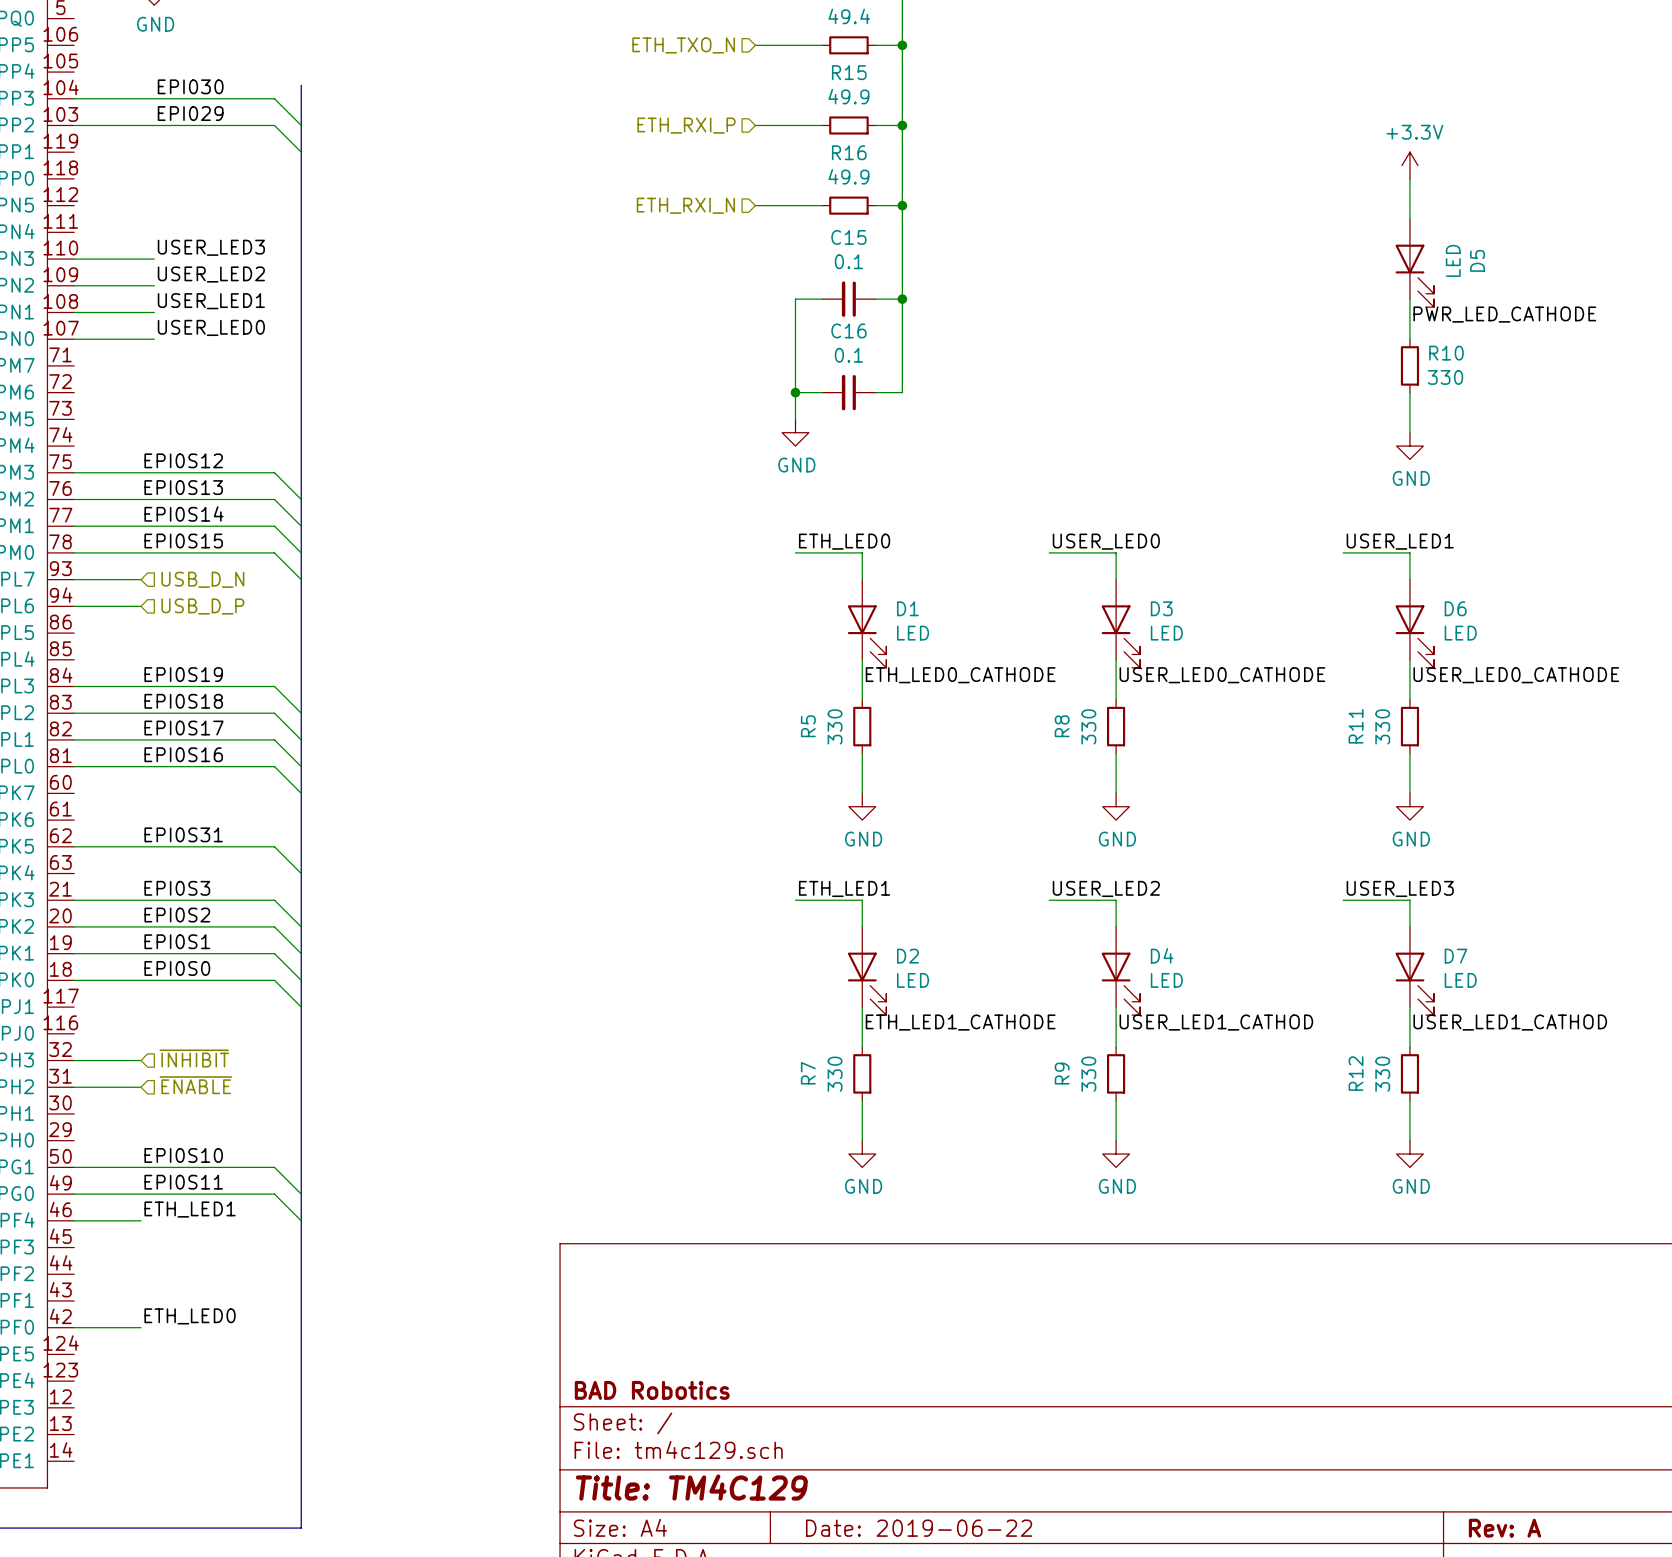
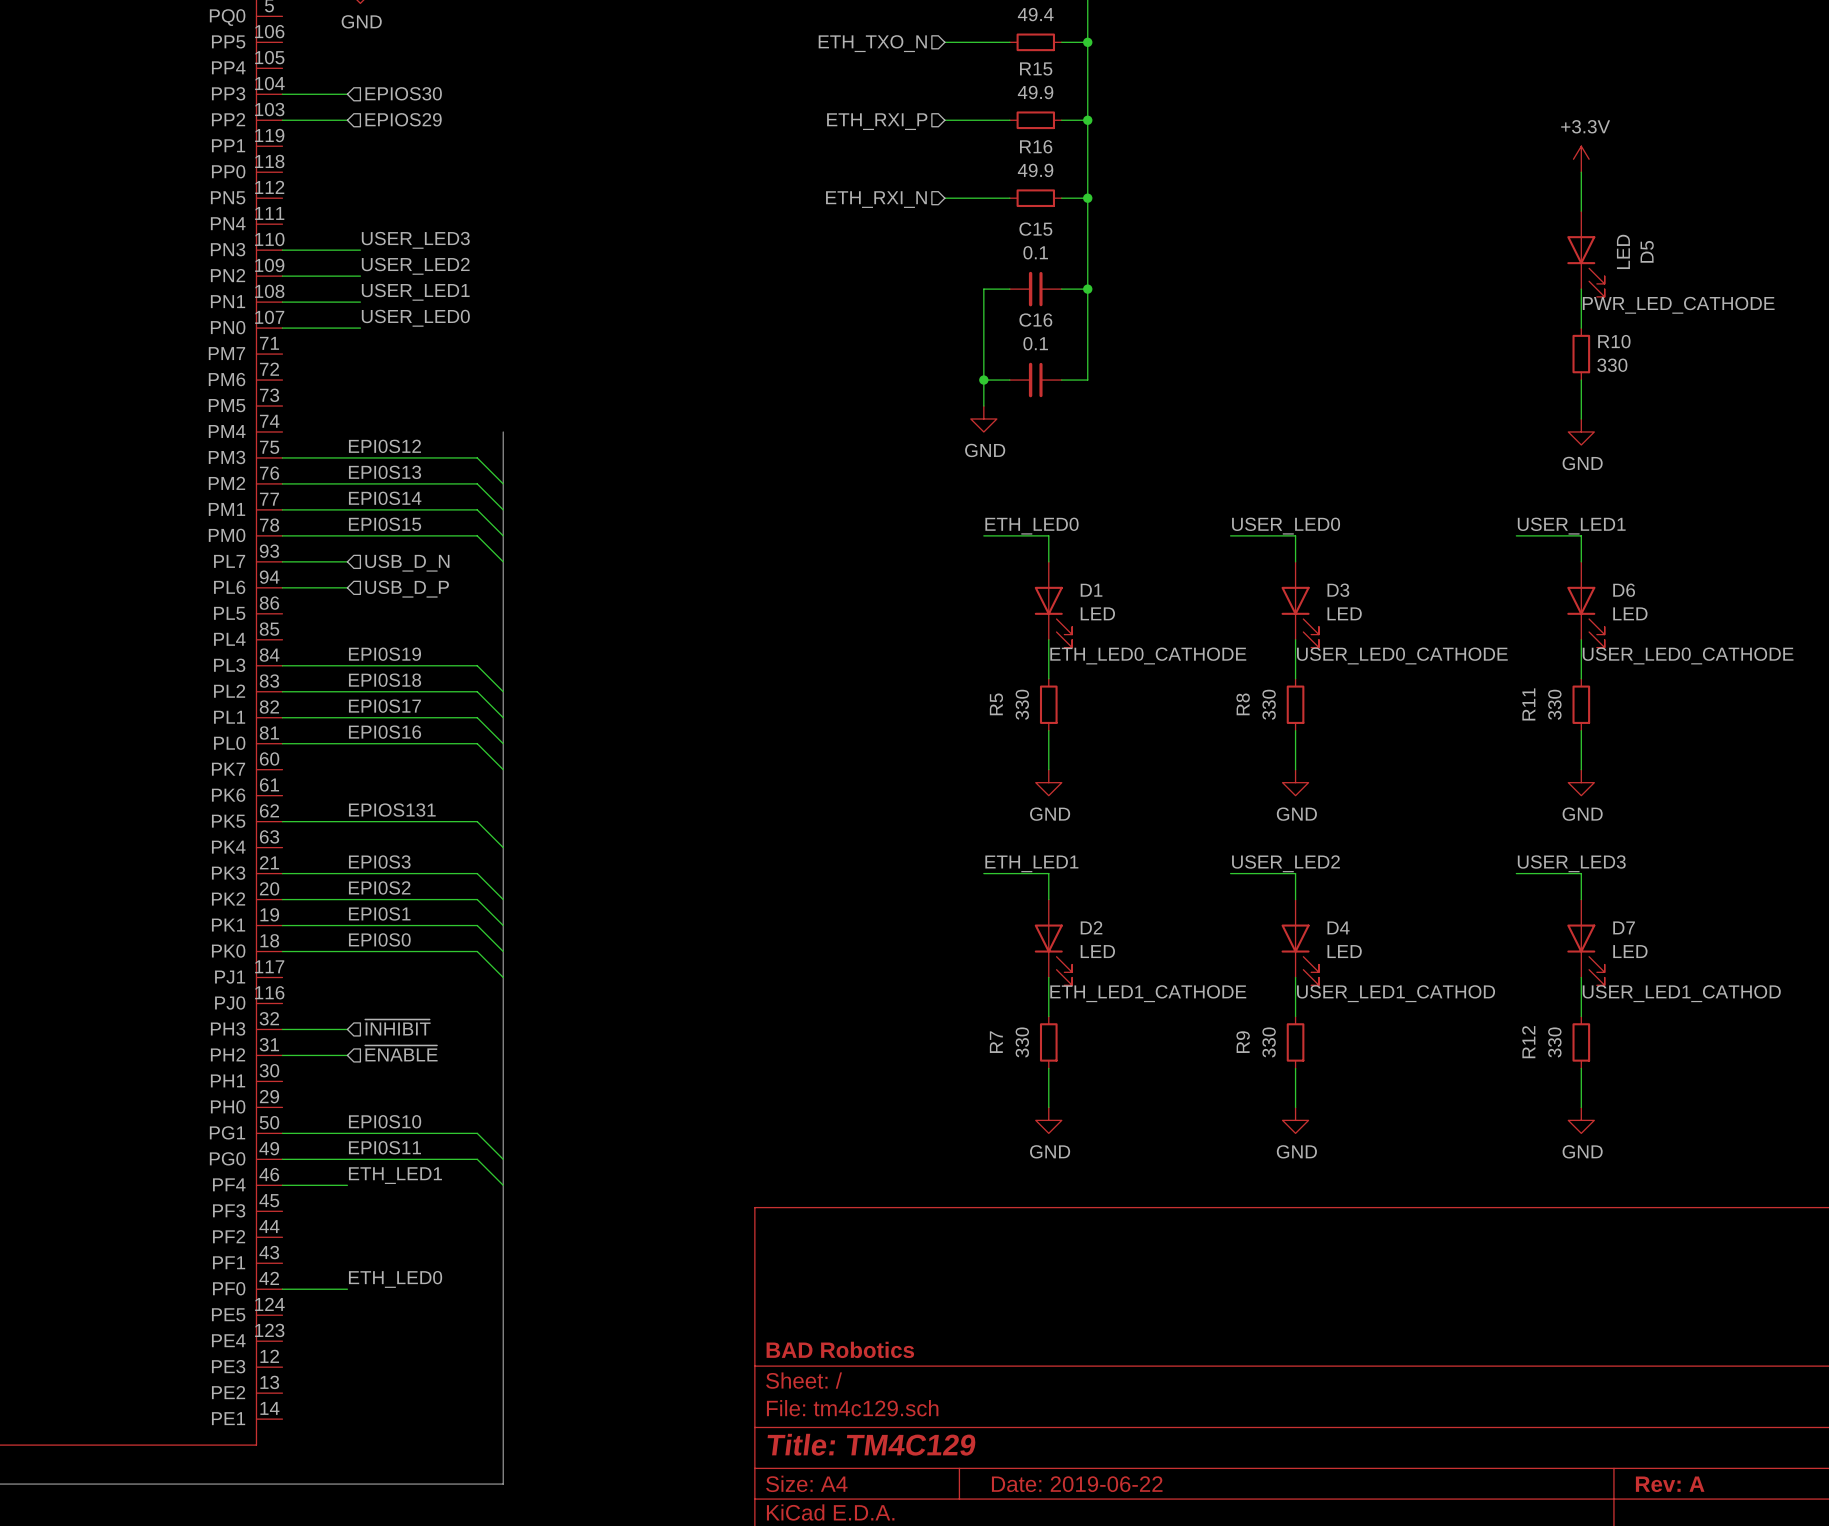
bus: (301, 85) (301, 446) -> none
label: EPI030 (190, 86) -> none
wire: (140, 98) (274, 98) (301, 125) -> none
hierarchical label: none -> EPIOS30 (403, 93)
label: EPI029 (190, 113) -> none
hierarchical label: none -> EPIOS29 (403, 119)
wire: (140, 125) (274, 125) (301, 152) -> none
label: EPI0S31 (183, 834) -> EPIOS131 (392, 810)

